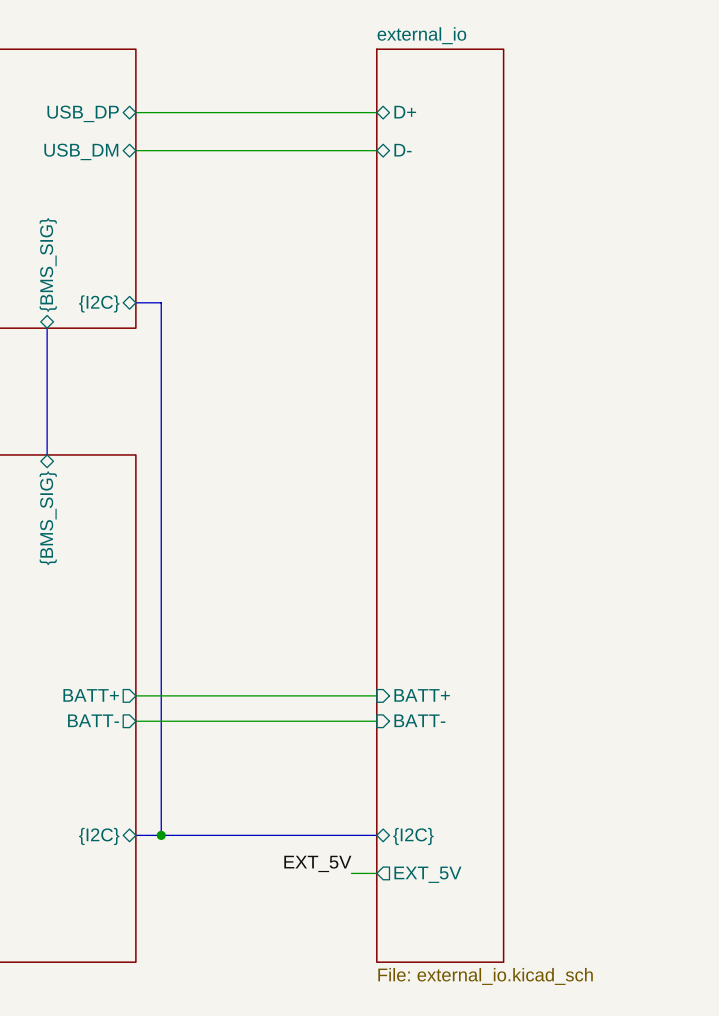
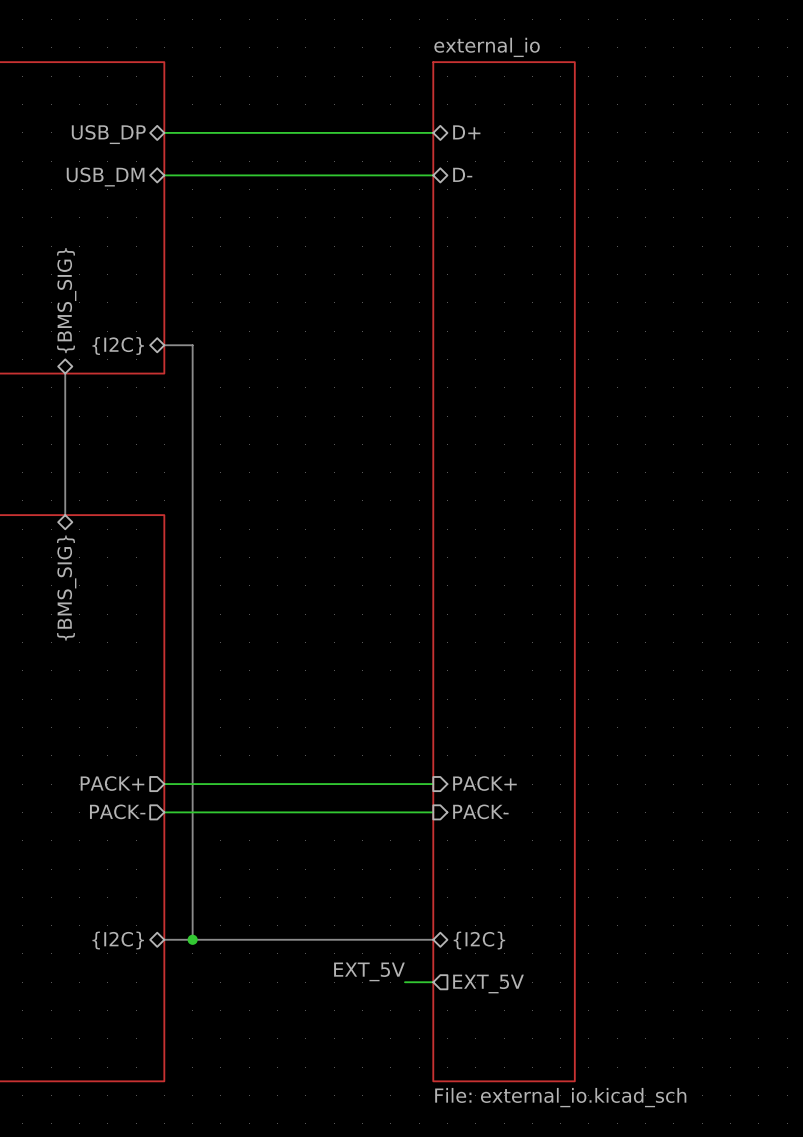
sheet pin: BATT+ (91, 695) -> PACK+ (112, 783)
sheet pin: BATT+ (422, 695) -> PACK+ (484, 783)
sheet pin: BATT- (93, 720) -> PACK- (117, 811)
sheet pin: BATT- (419, 720) -> PACK- (480, 811)

